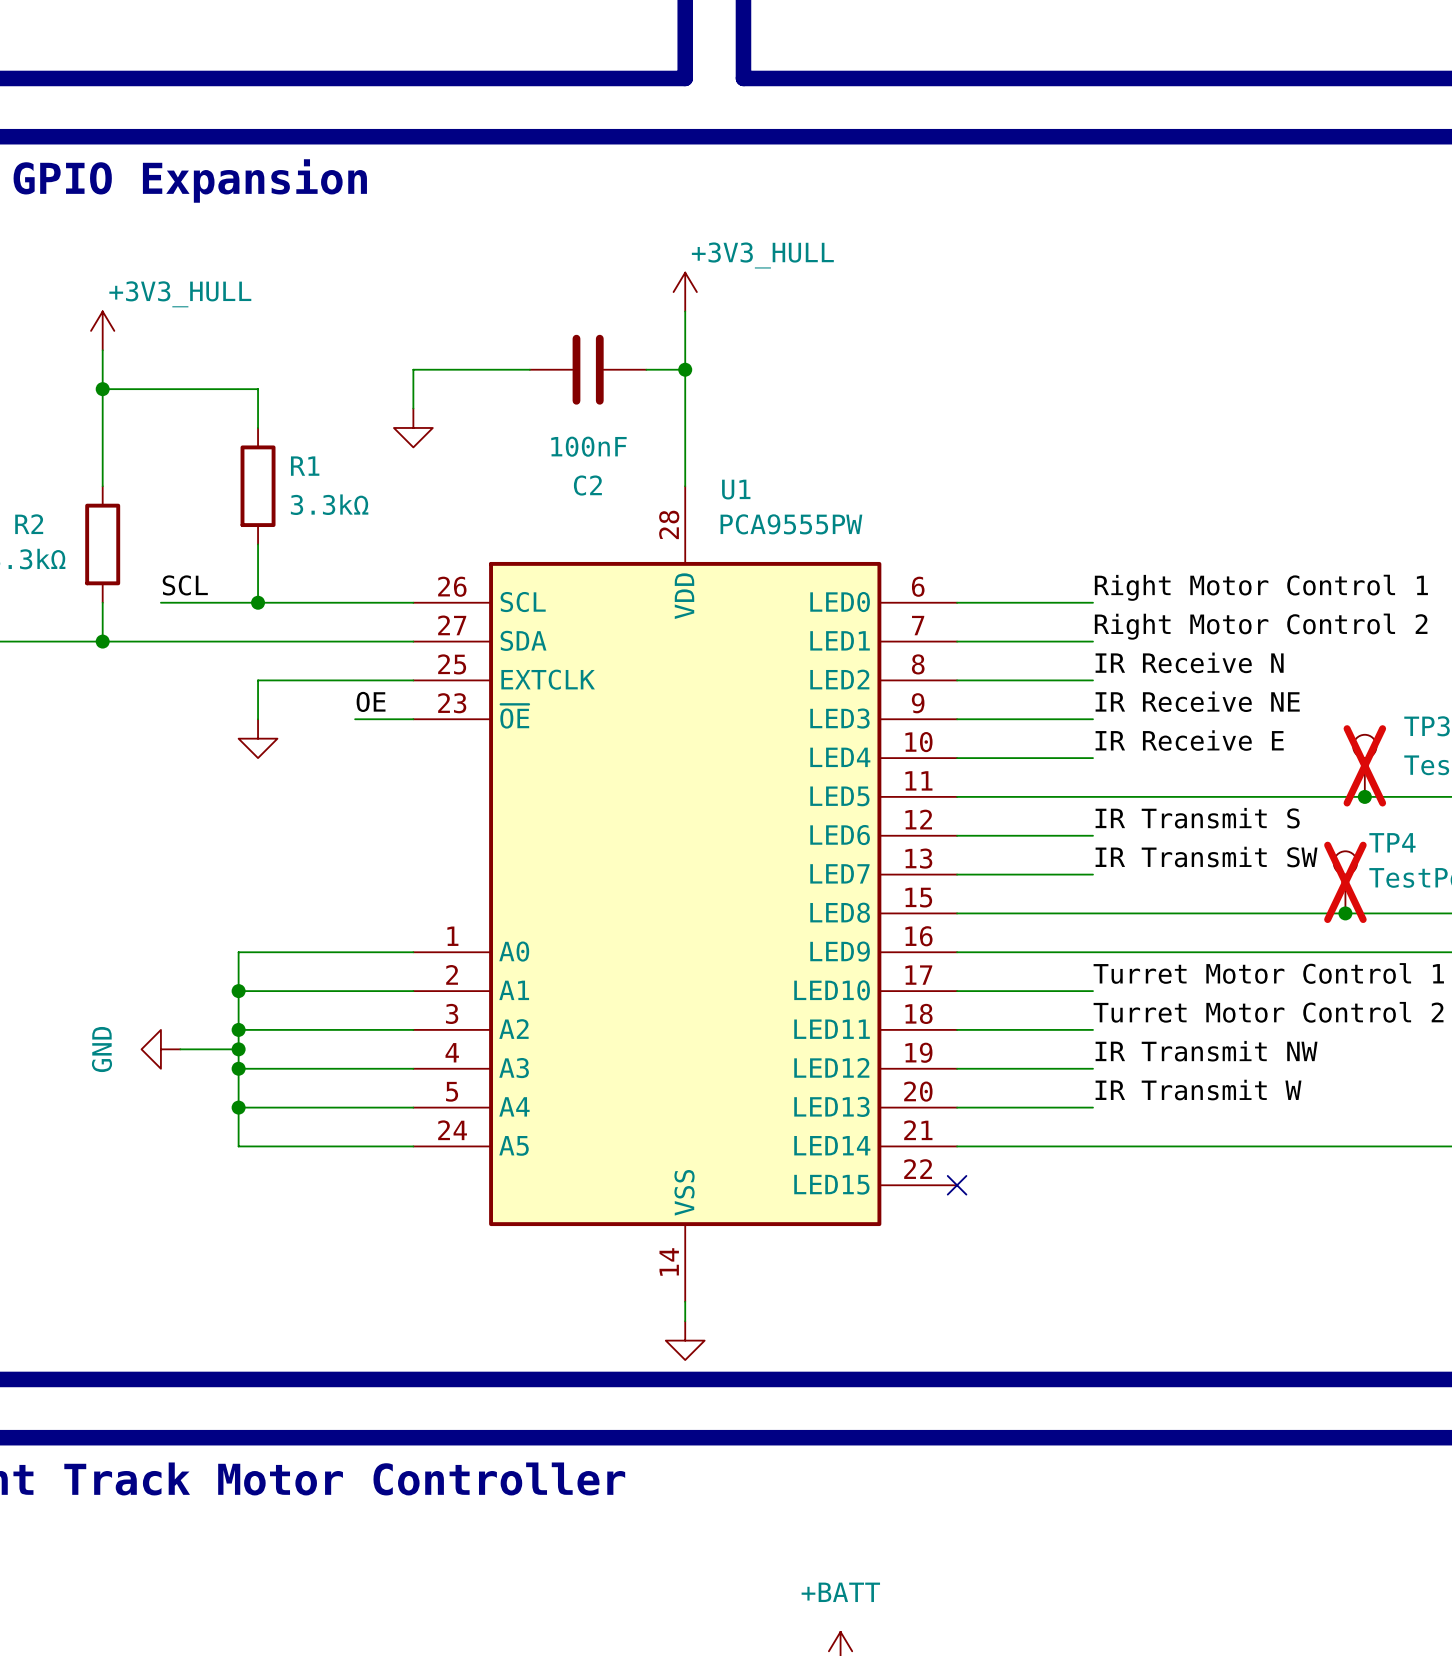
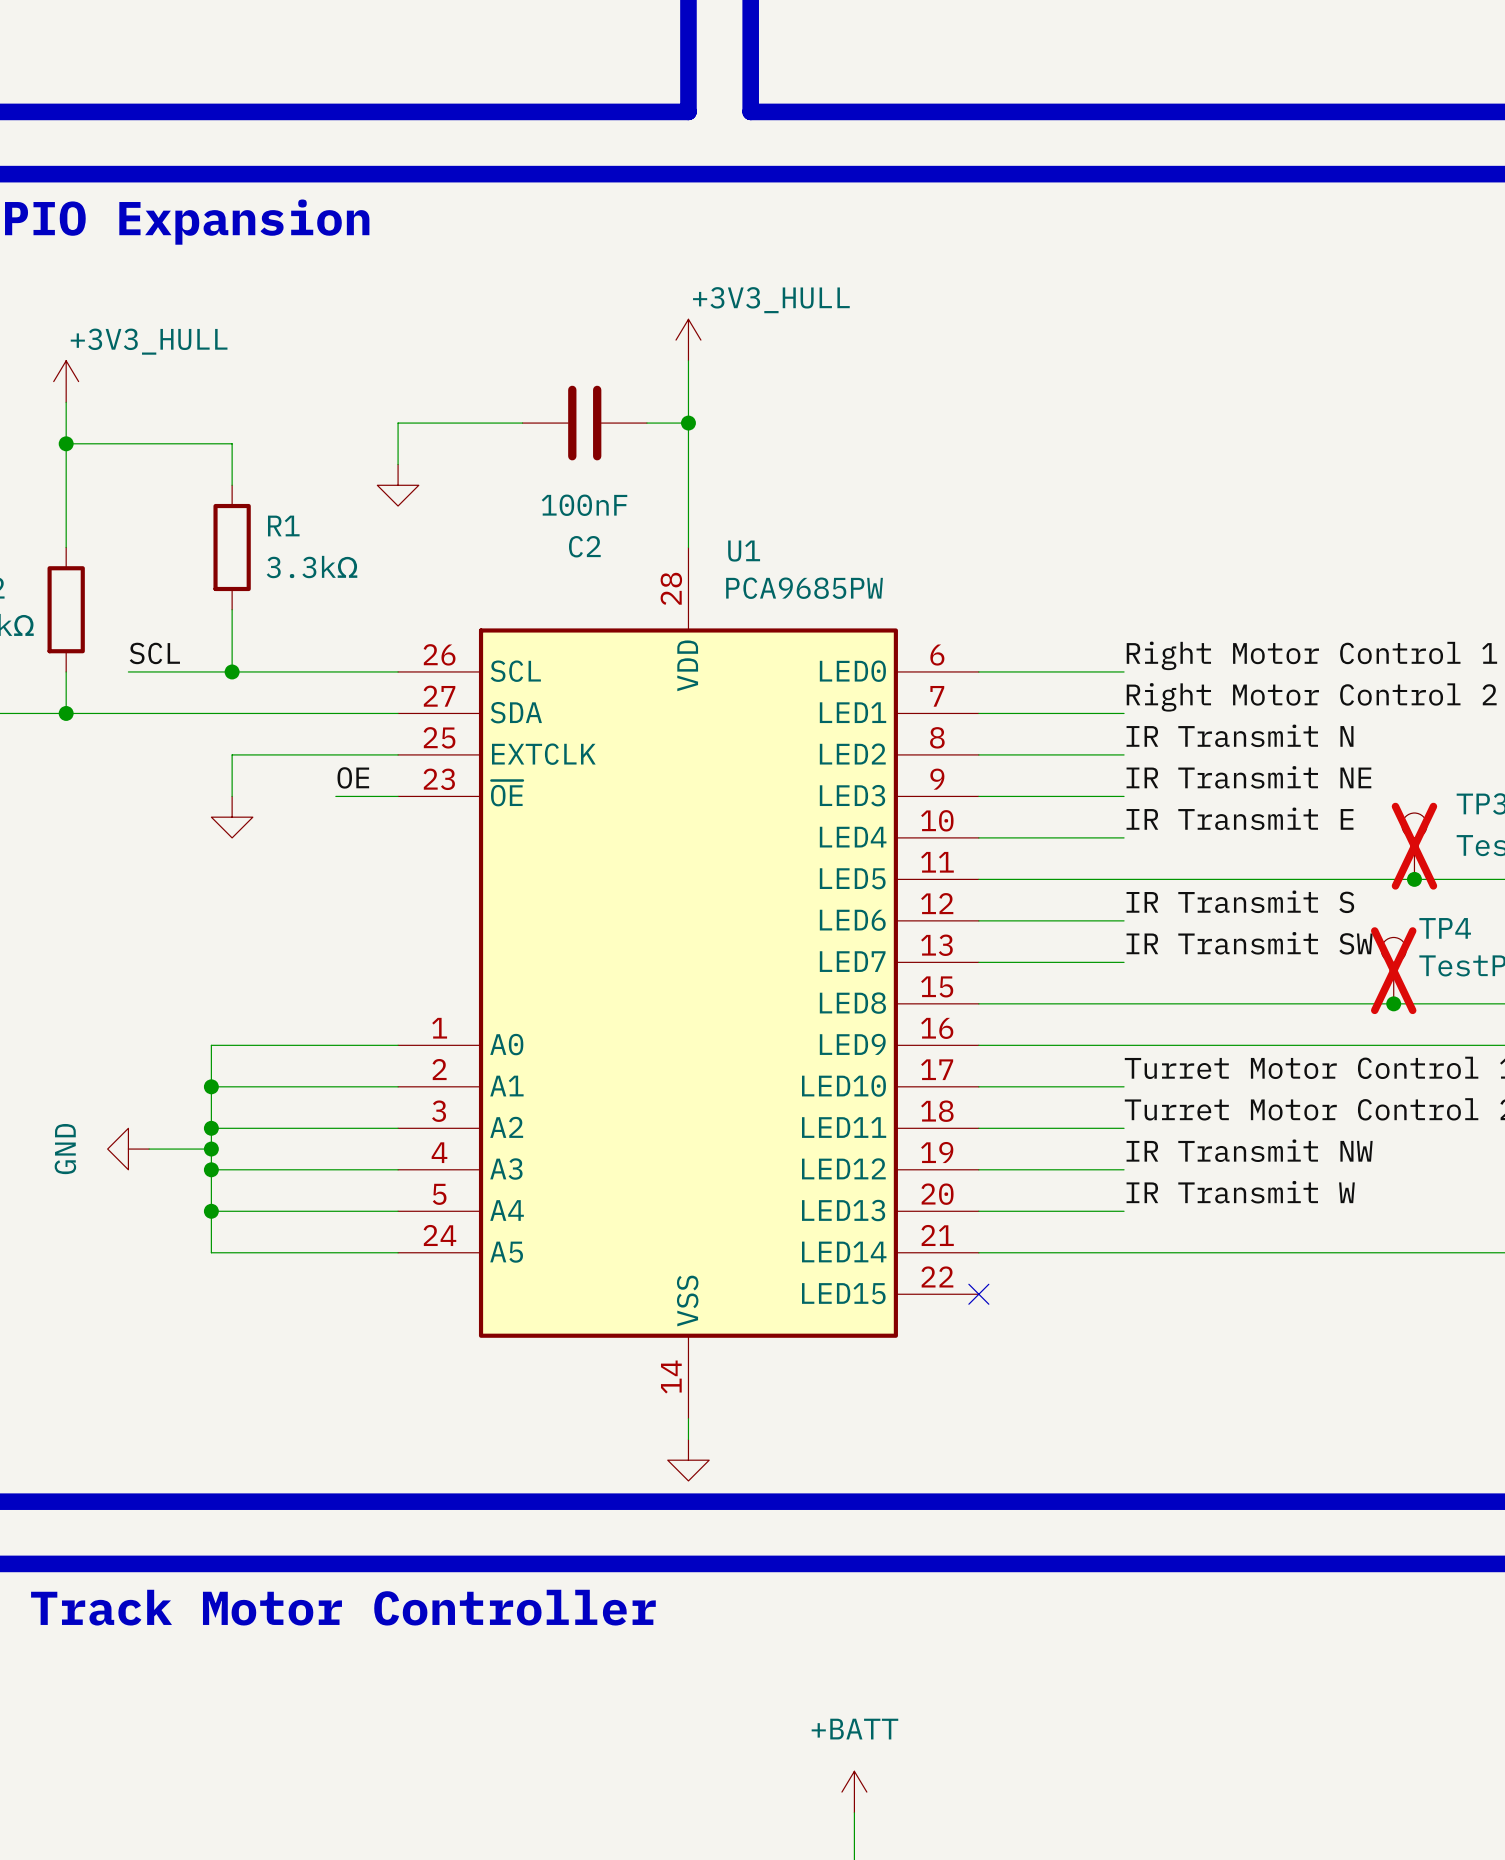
U1 value: PCA9555PW (791, 524) -> PCA9685PW (804, 588)
label: IR Receive N (1189, 662) -> IR Transmit N (1240, 735)
label: IR Receive NE (1197, 701) -> IR Transmit NE (1248, 777)
label: IR Receive E (1189, 740) -> IR Transmit E (1240, 818)

